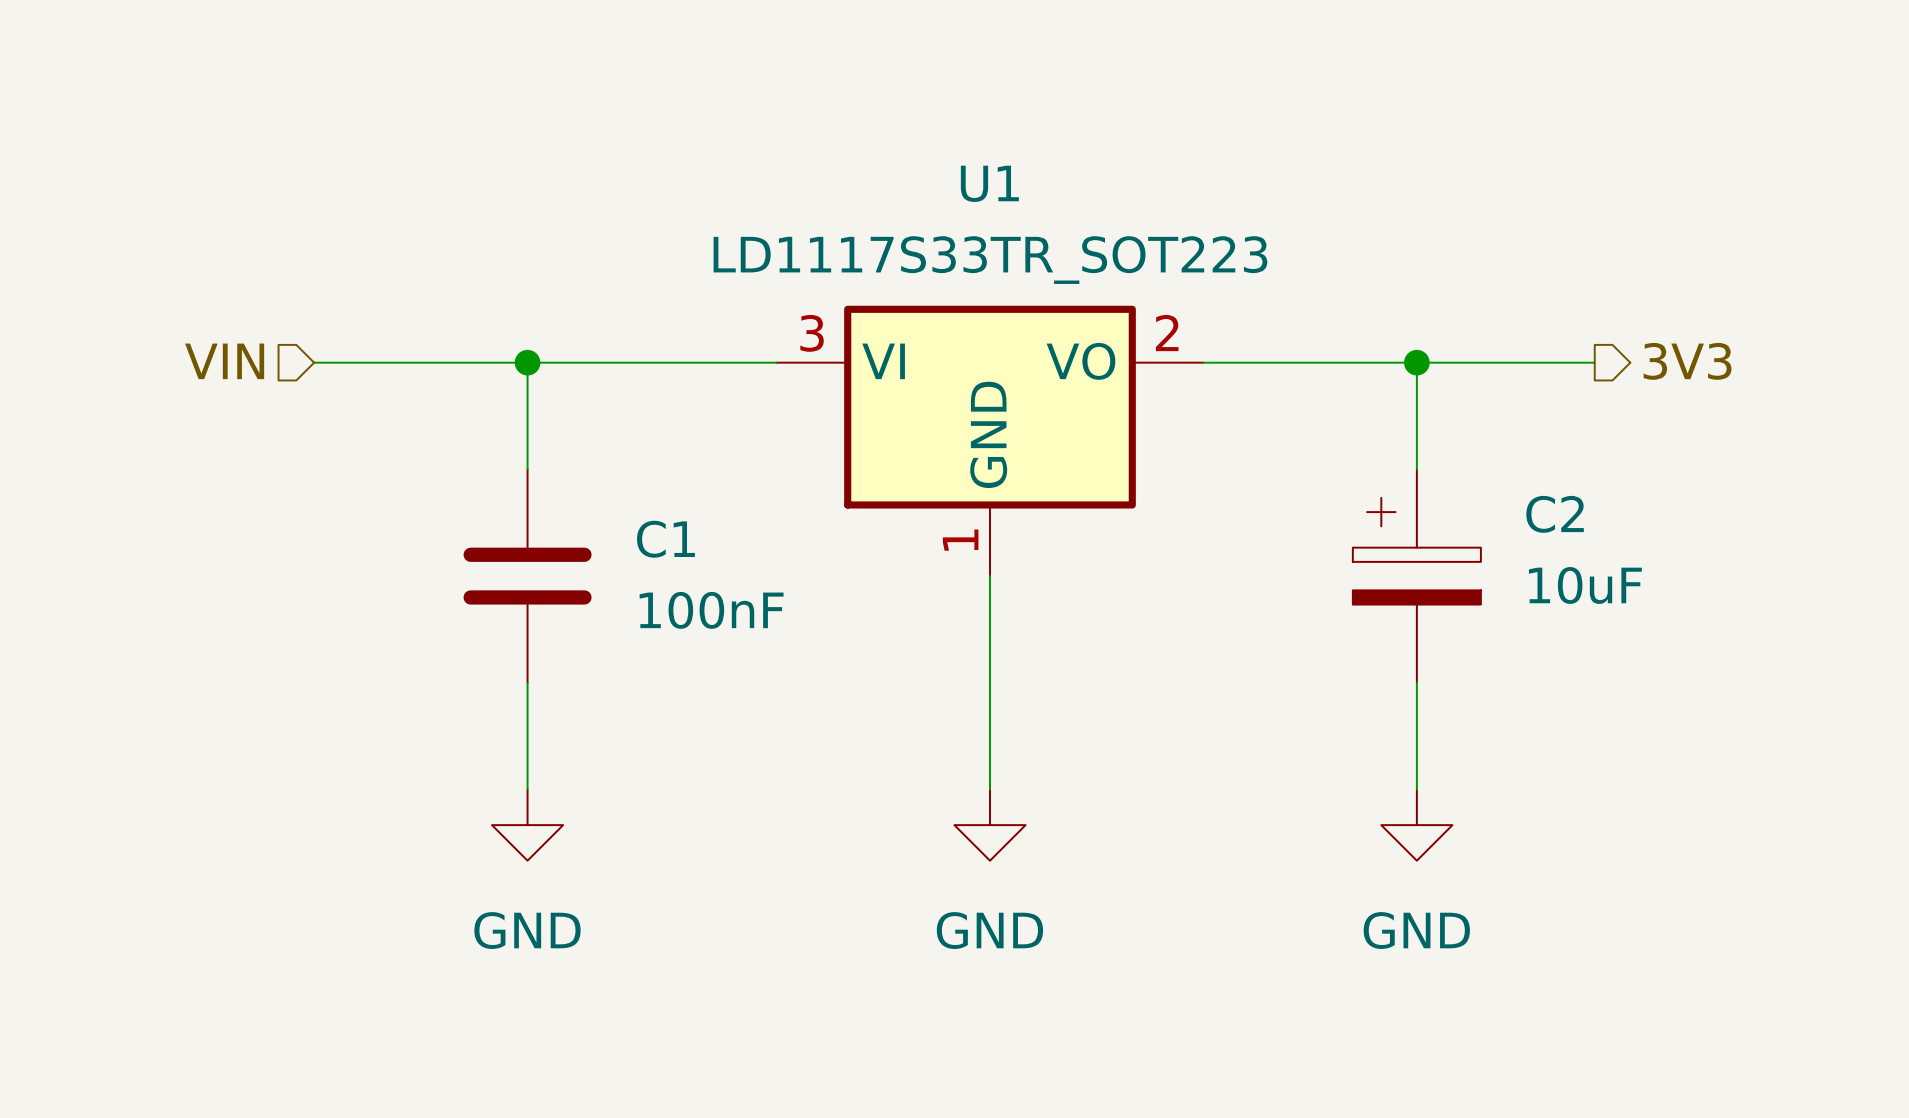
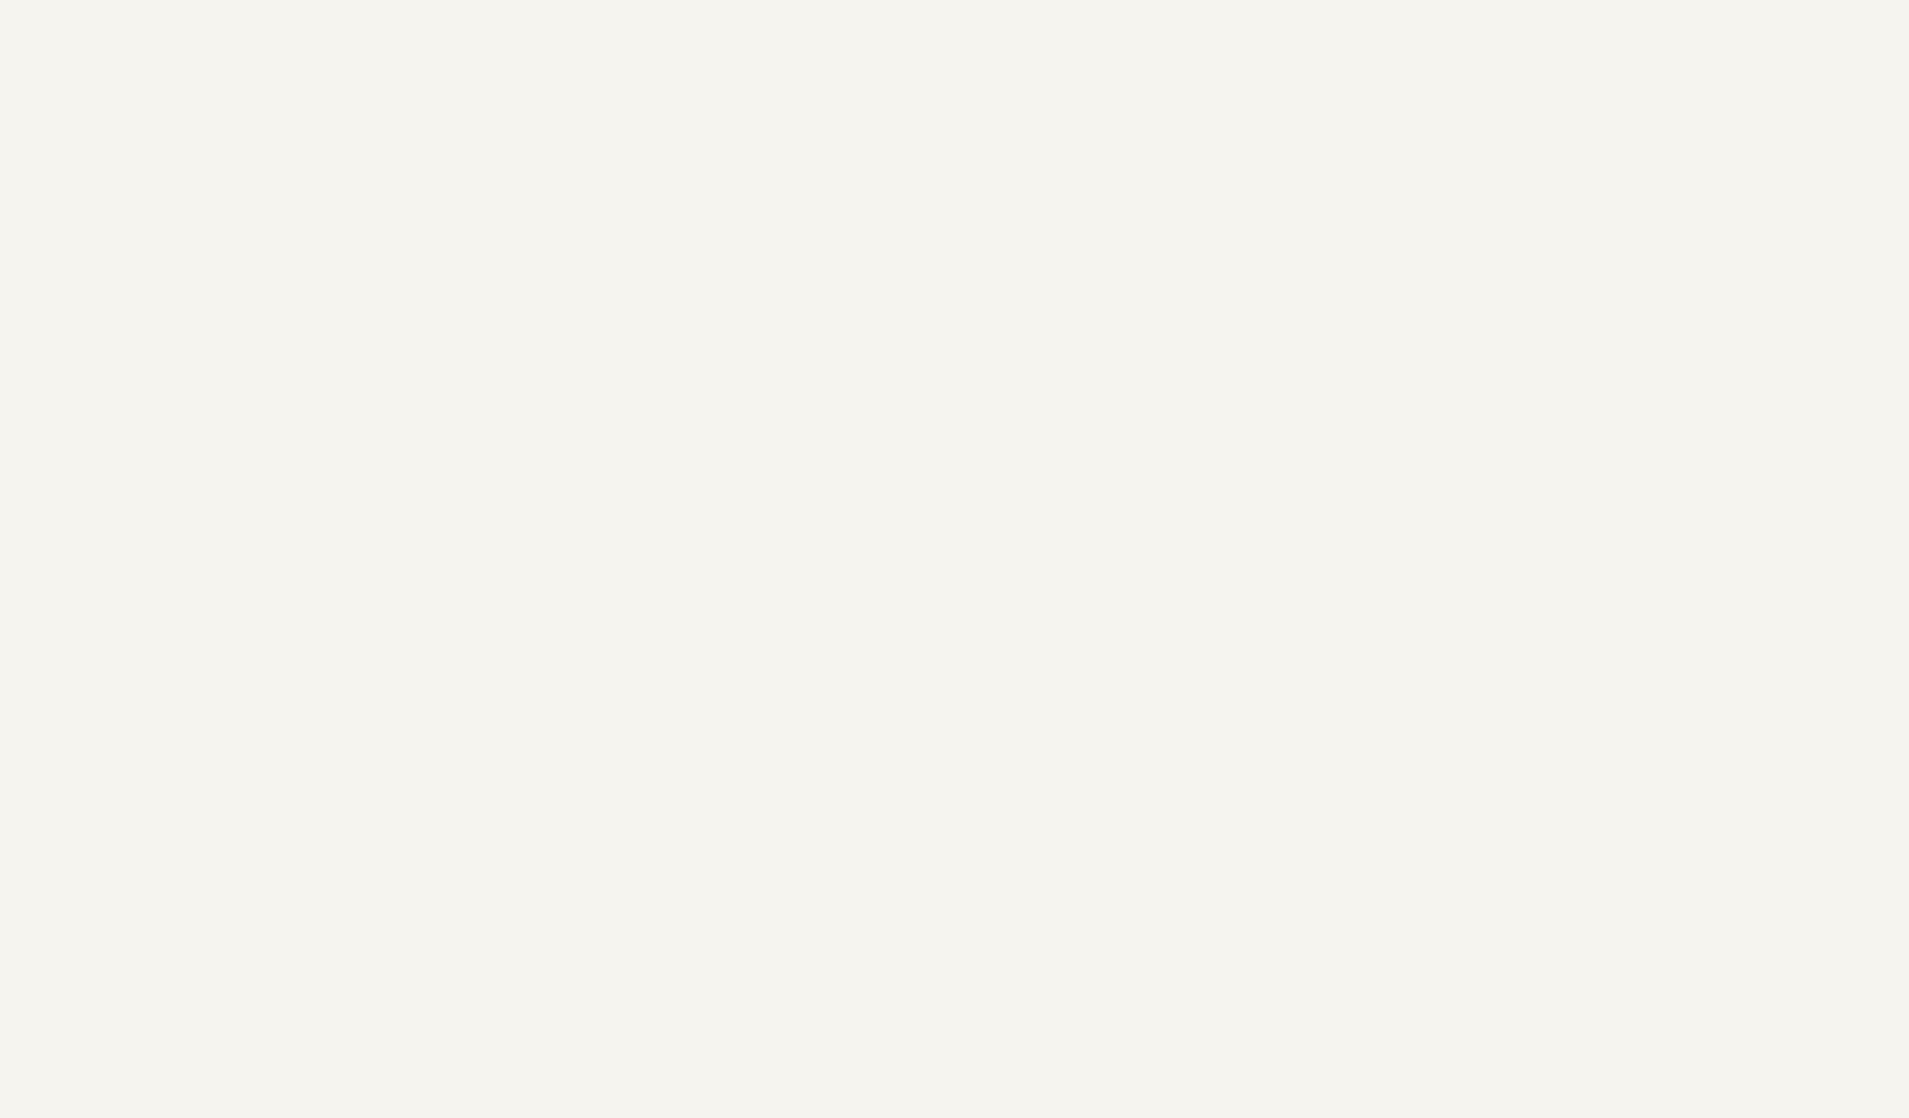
hierarchical label: VIN (224, 361) -> none
hierarchical label: 3V3 (1687, 361) -> none
wire: (314, 362) (776, 362) -> none
wire: (527, 362) (527, 469) -> none
junction: (527, 362) -> none
wire: (1203, 362) (1594, 362) -> none
wire: (1416, 362) (1416, 469) -> none
junction: (1416, 362) -> none
U1: LD1117S33TR_SOT223 (990, 440) -> none
C1: 100nF (527, 576) -> none
wire: (990, 576) (990, 789) -> none
C2: 10uF (1416, 576) -> none
wire: (527, 682) (527, 789) -> none
wire: (1416, 682) (1416, 789) -> none
power symbol: GND (527, 825) -> none
power symbol: GND (990, 825) -> none
power symbol: GND (1416, 825) -> none

